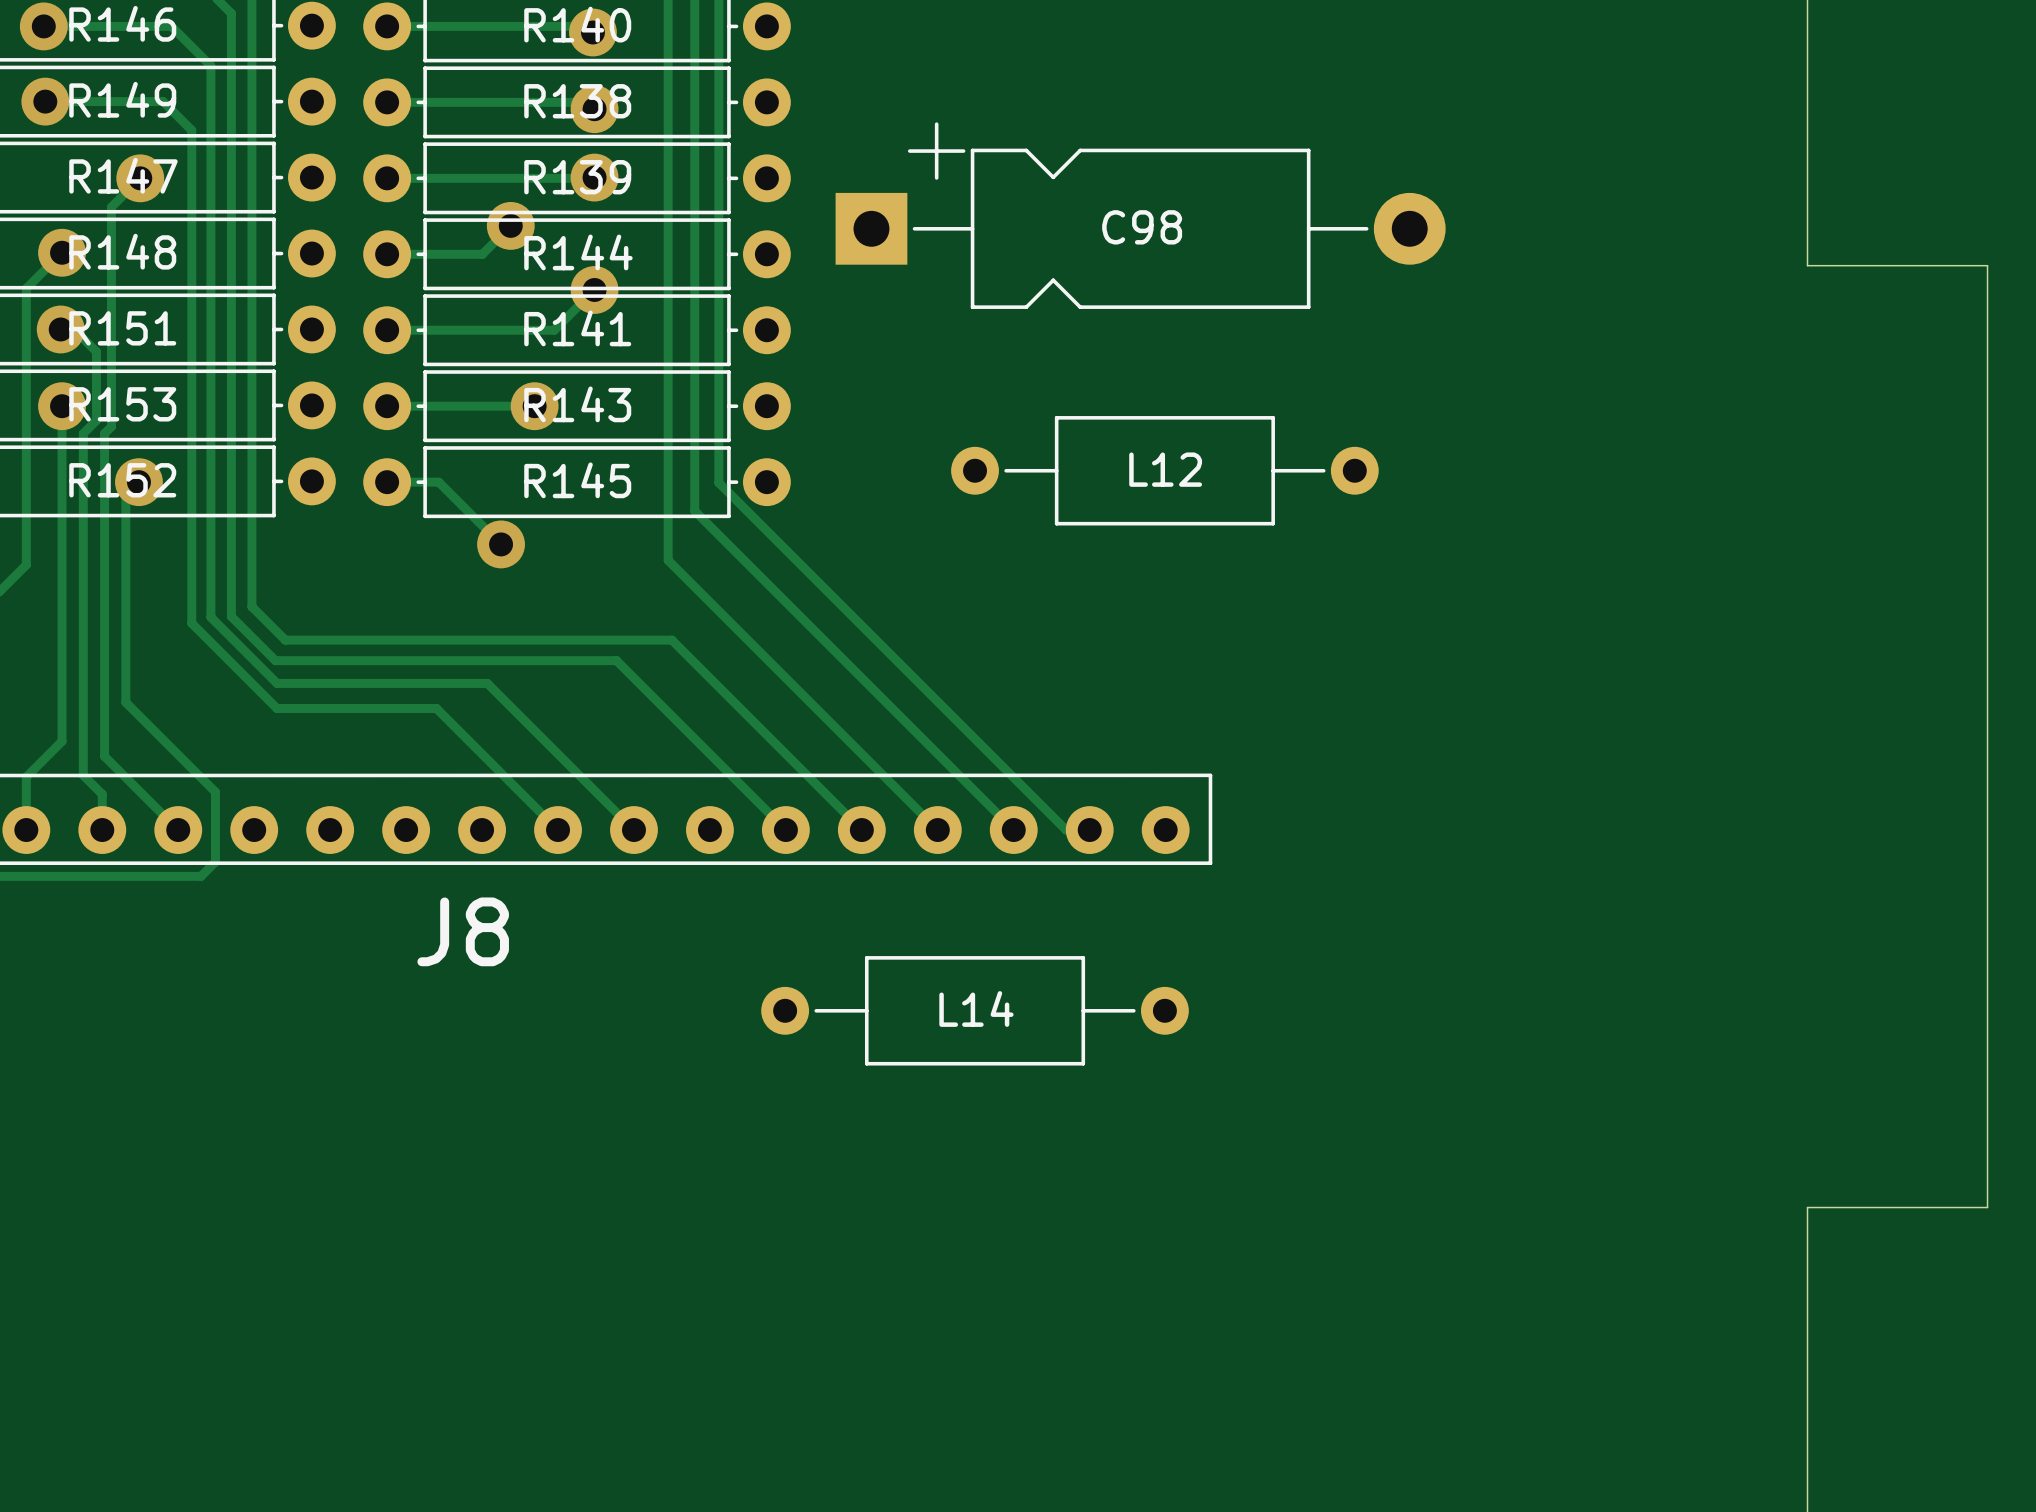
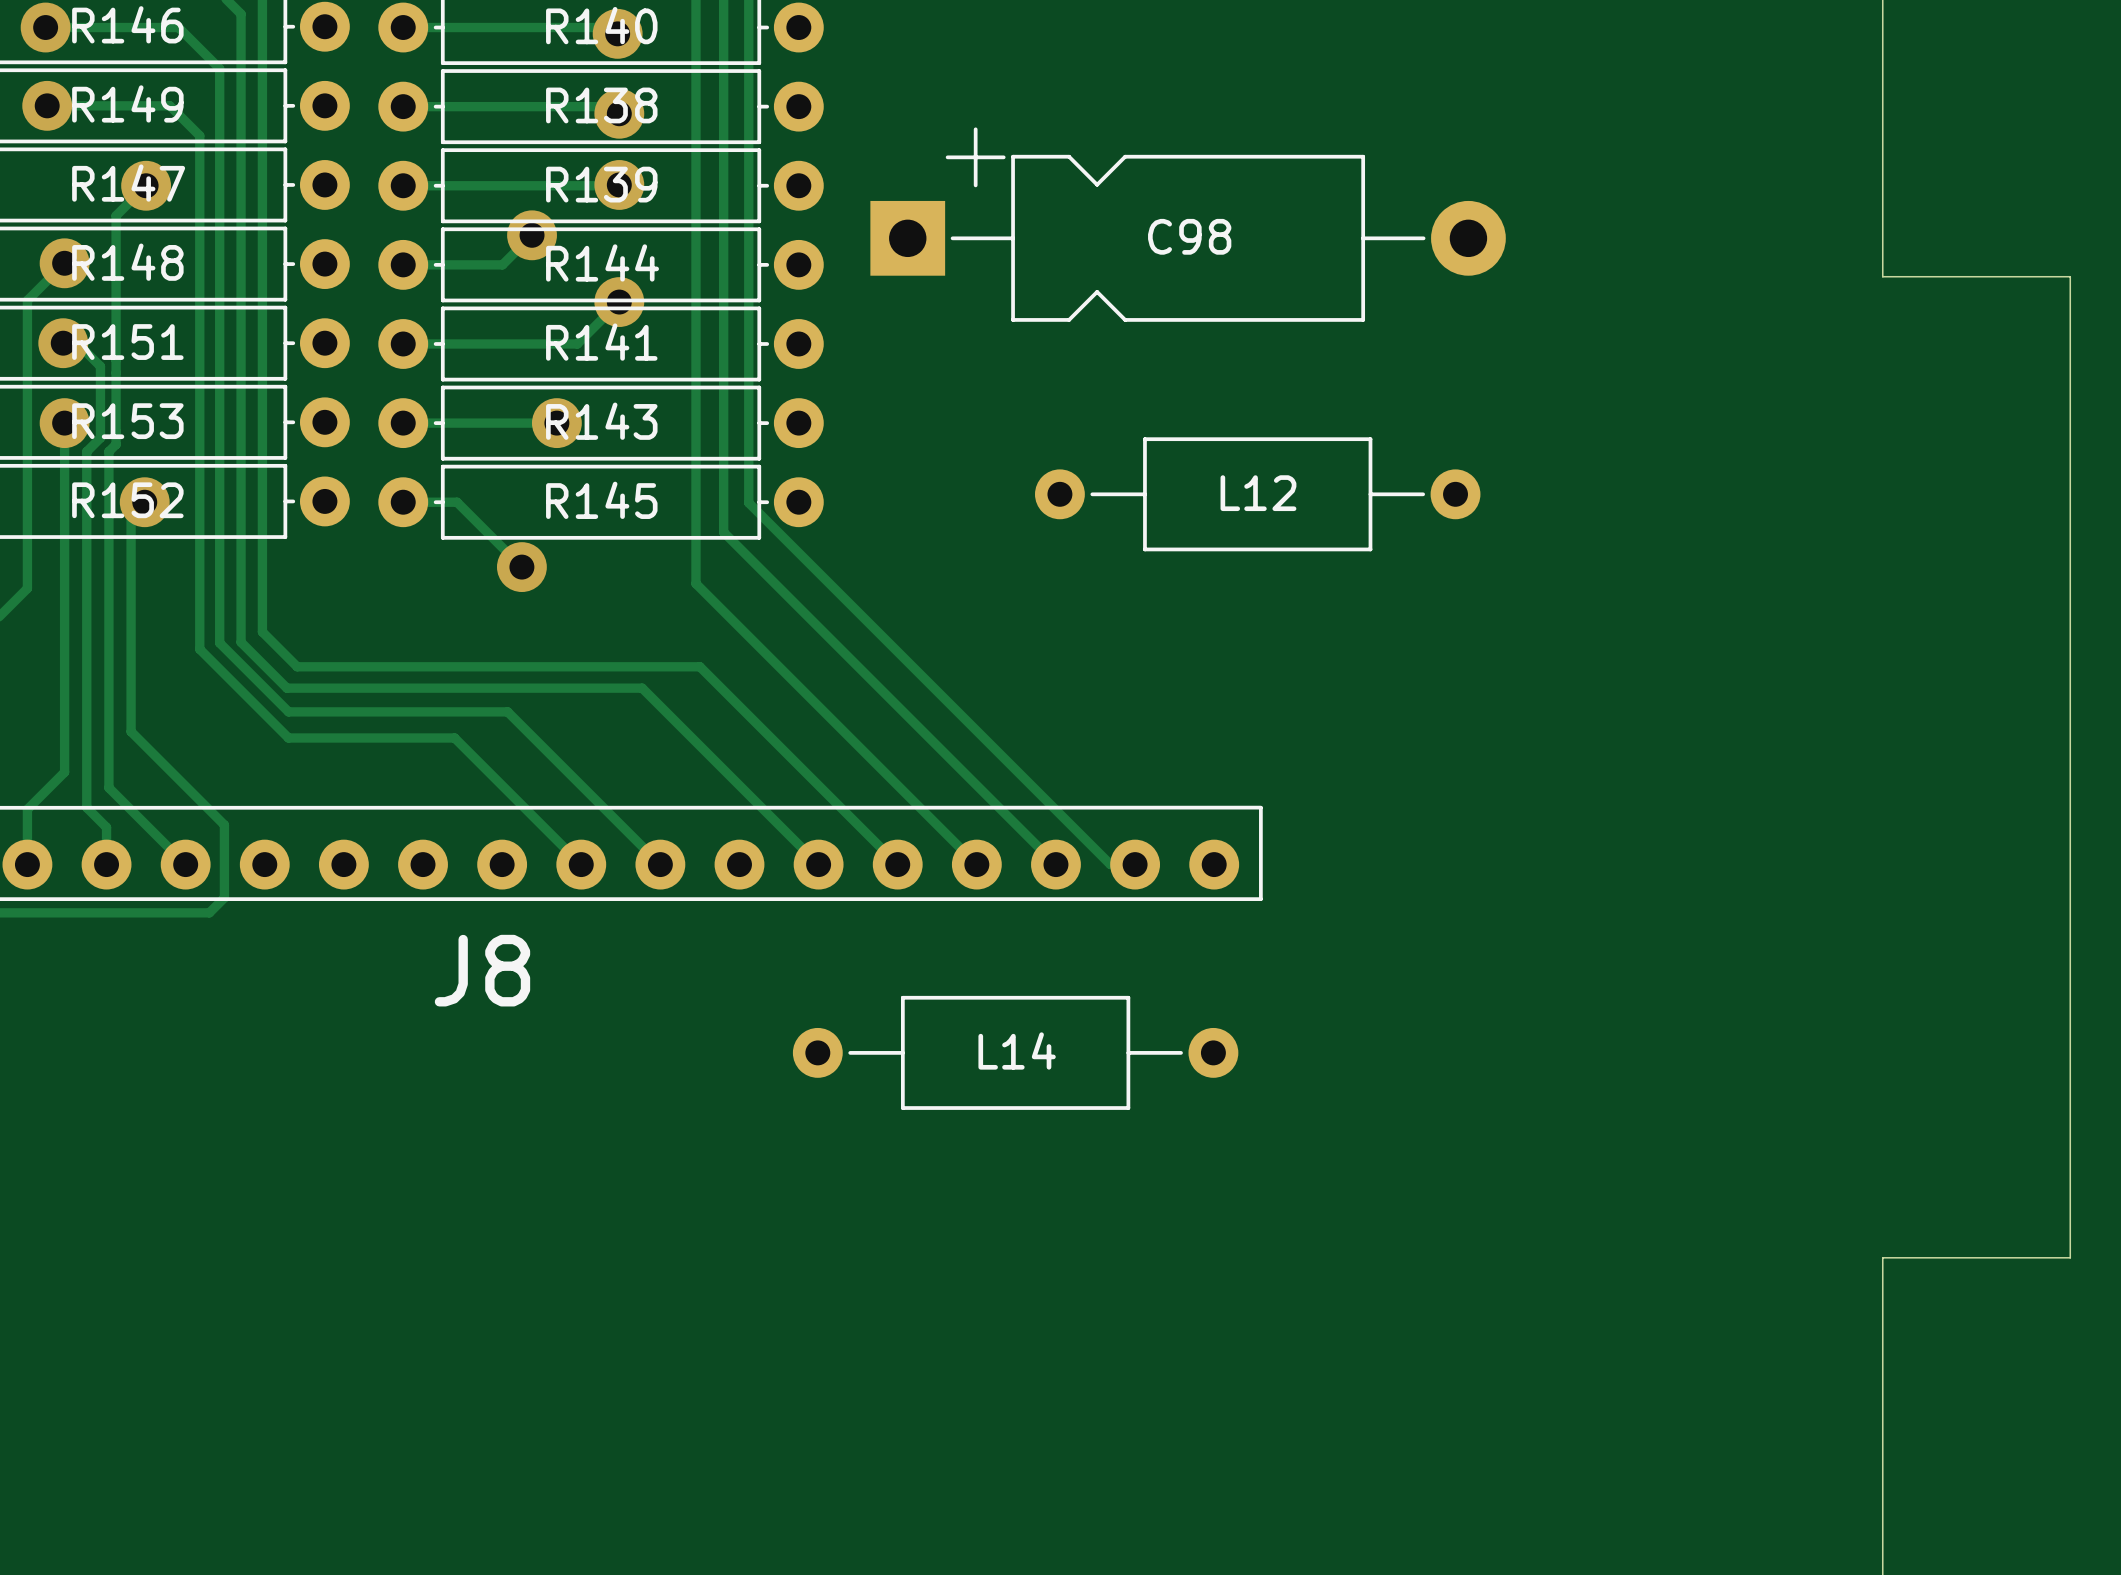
L12 position: (1164, 470) -> (1257, 494)

